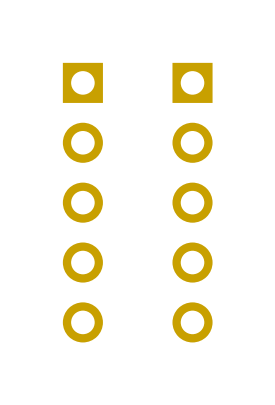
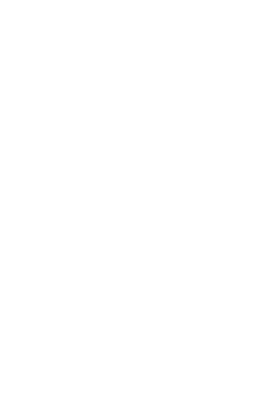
part: (82, 202) -> none
part: (192, 202) -> none

